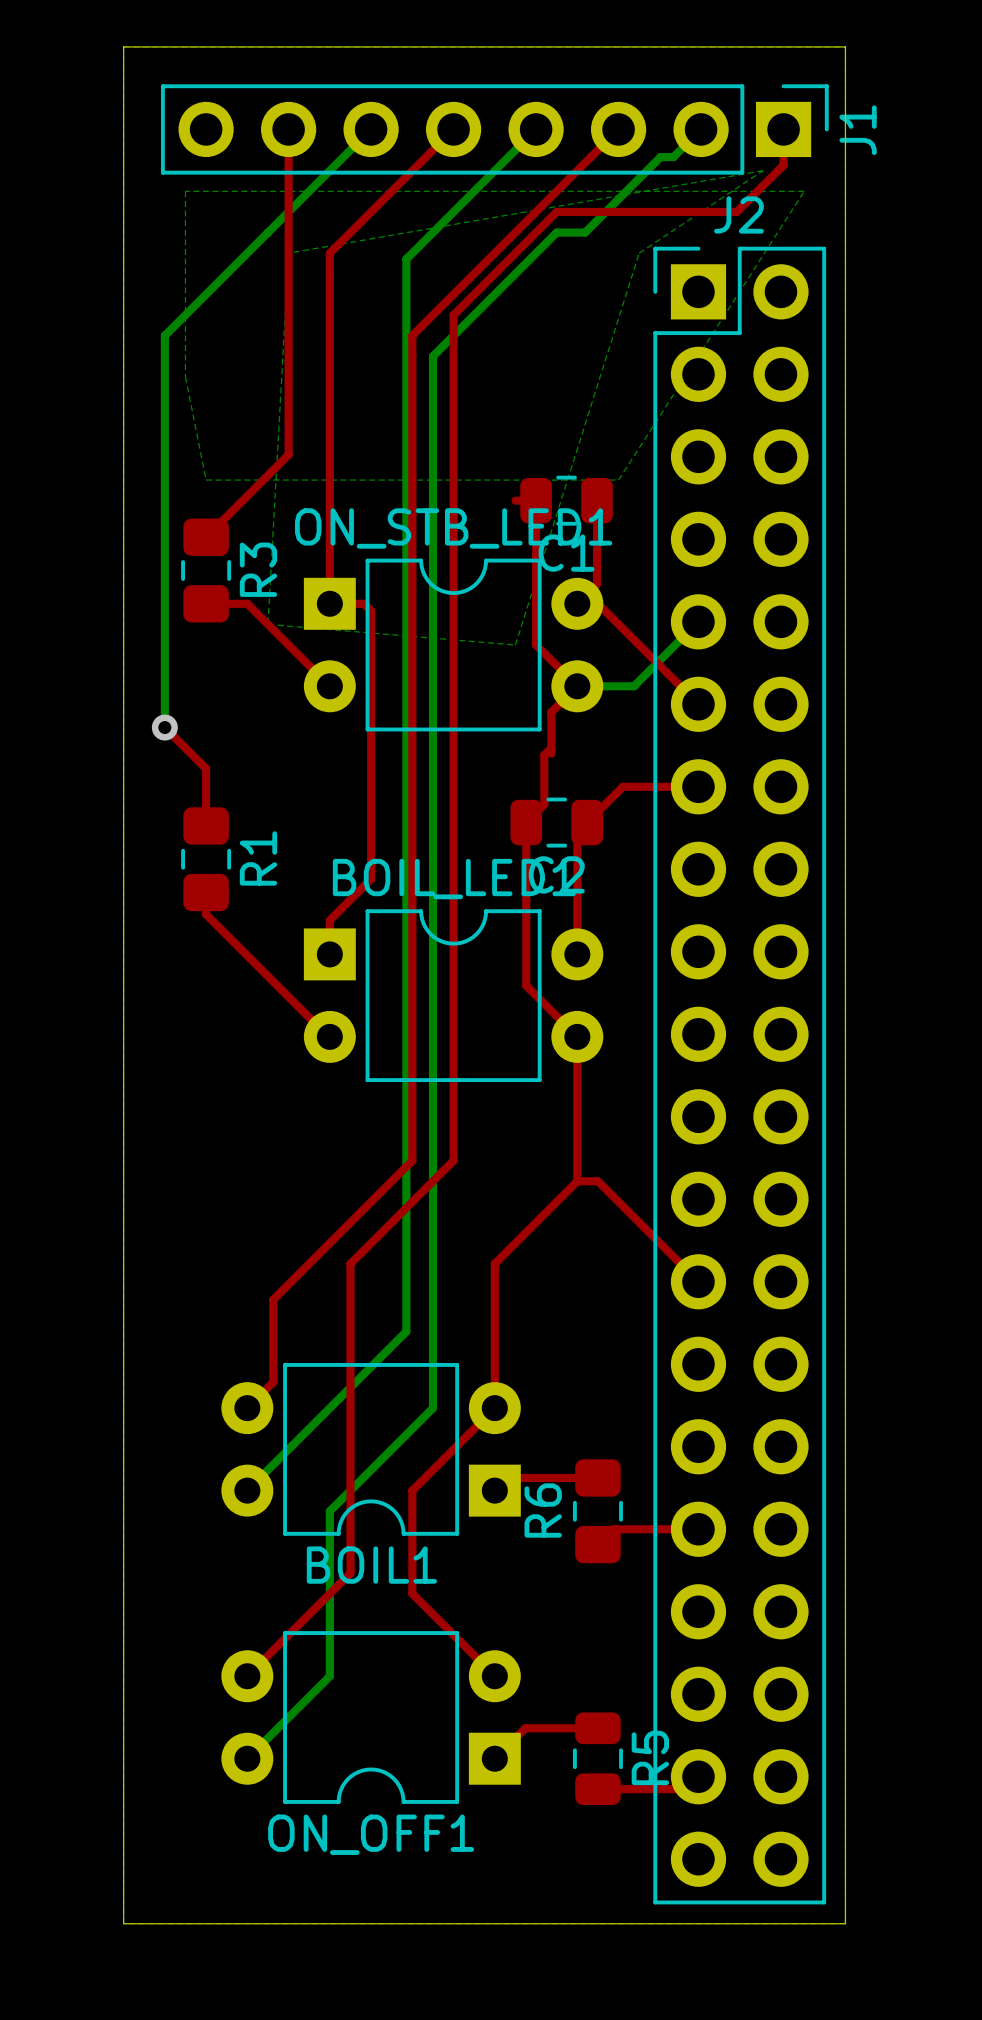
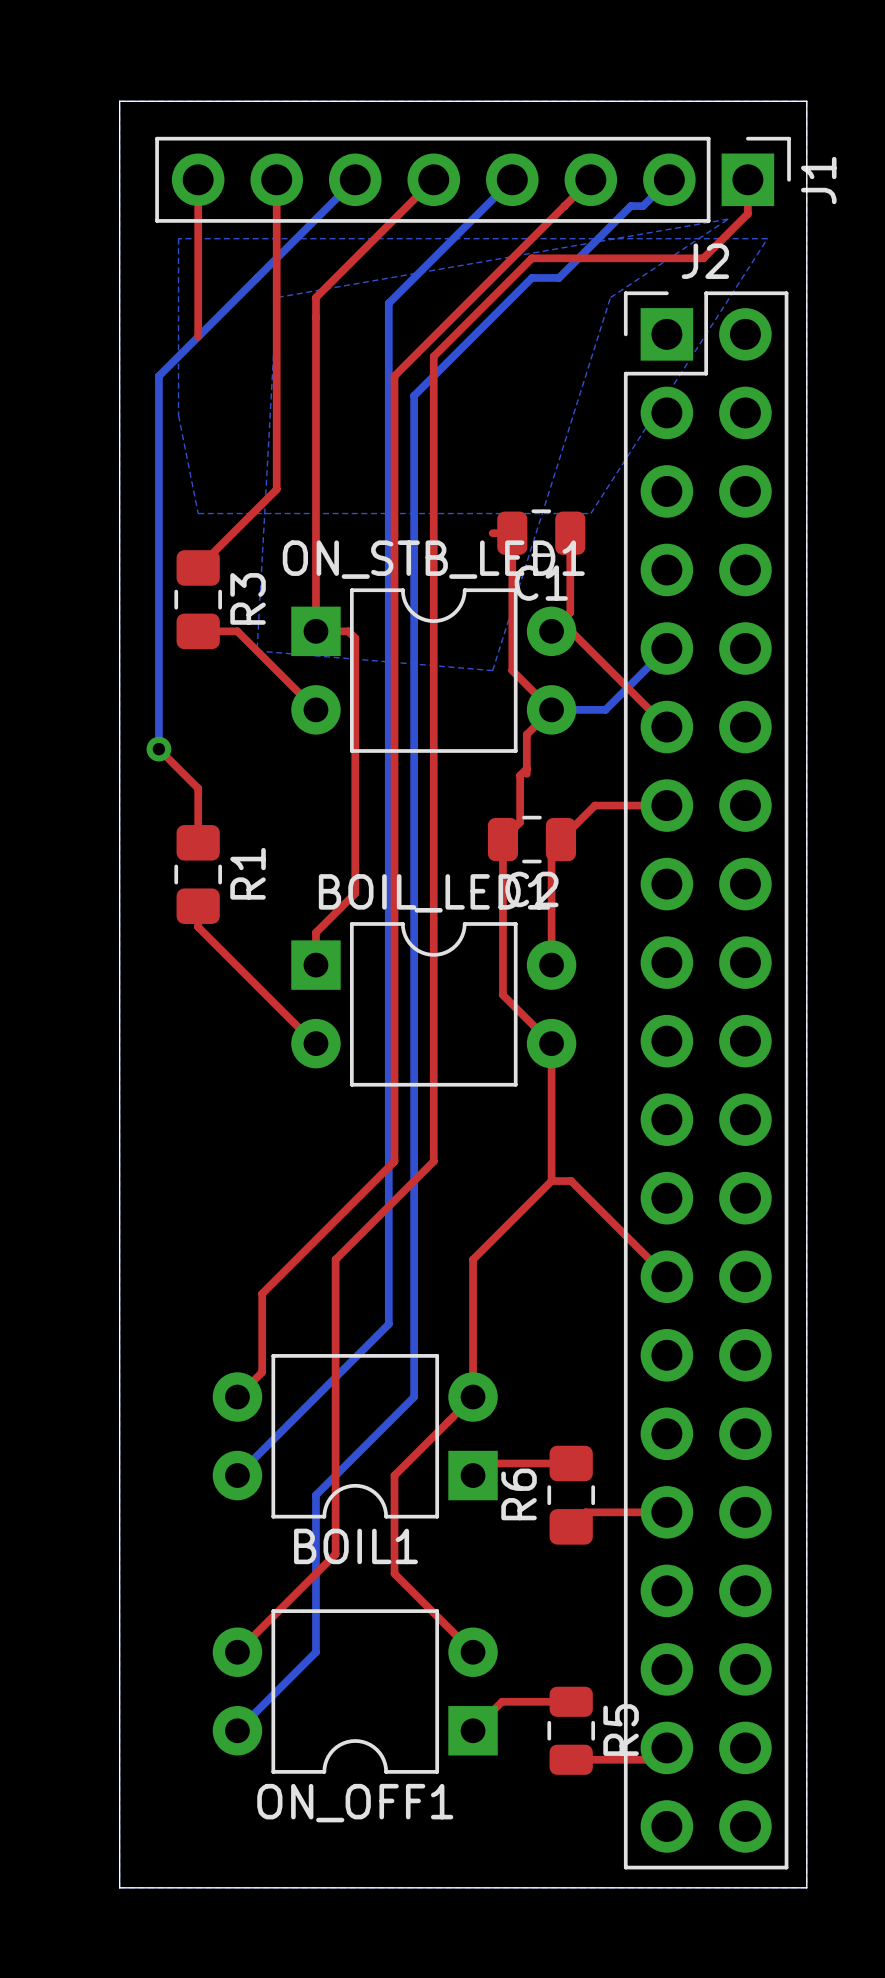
top track: none -> (198, 179) (198, 336)

